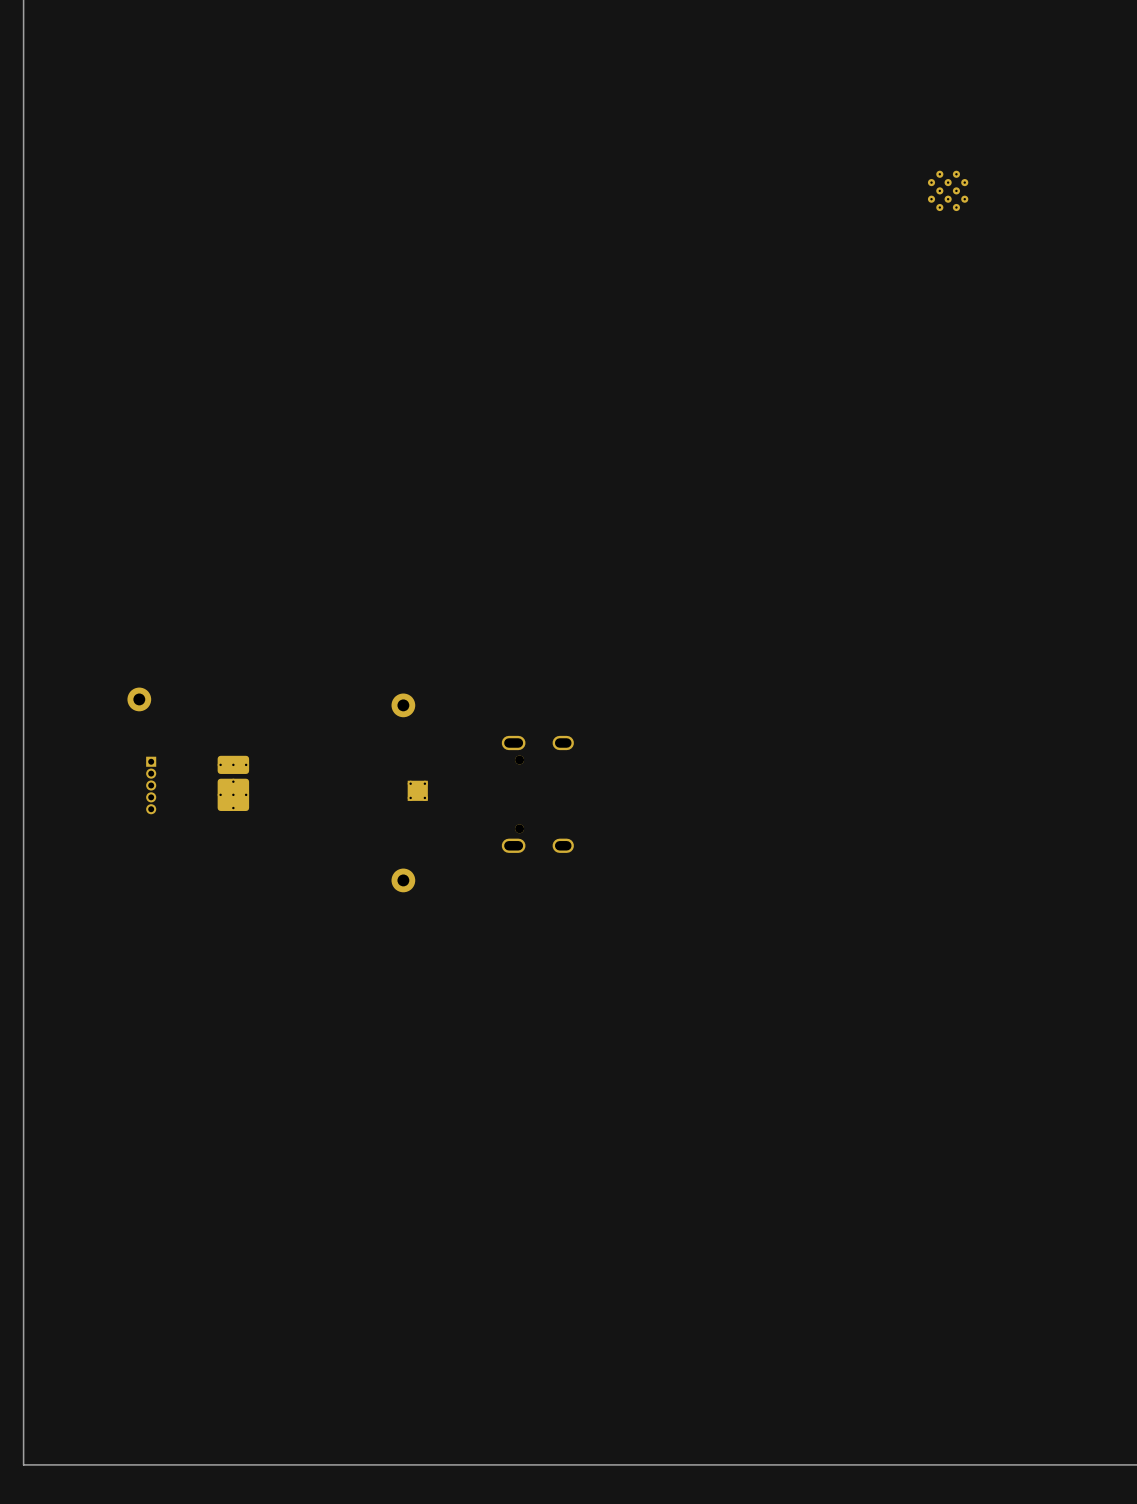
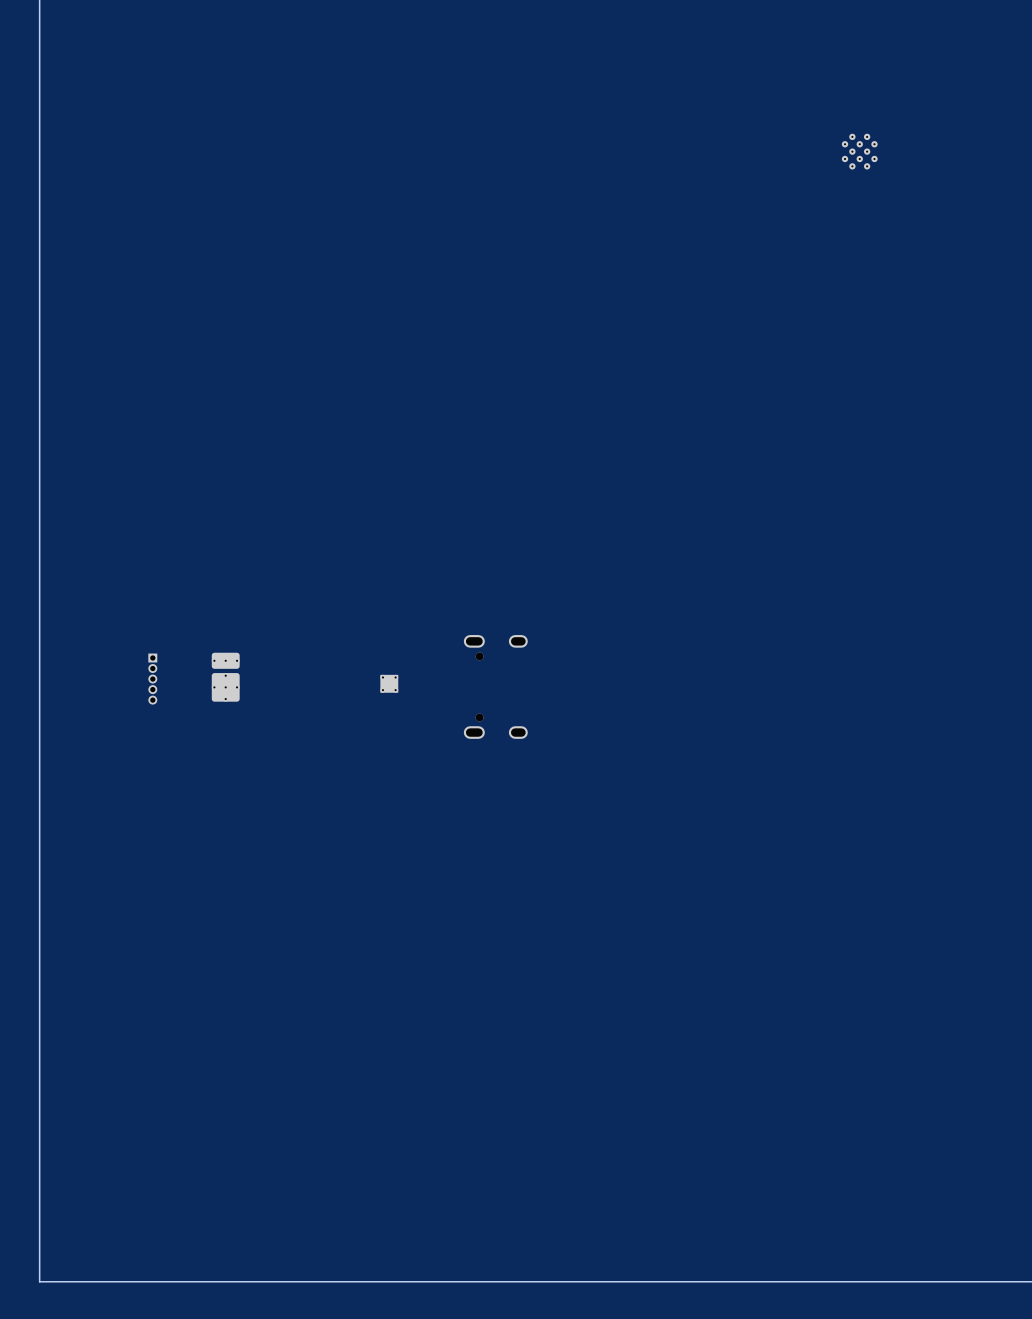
part: (139, 699) -> none
part: (403, 705) -> none
part: (403, 880) -> none

